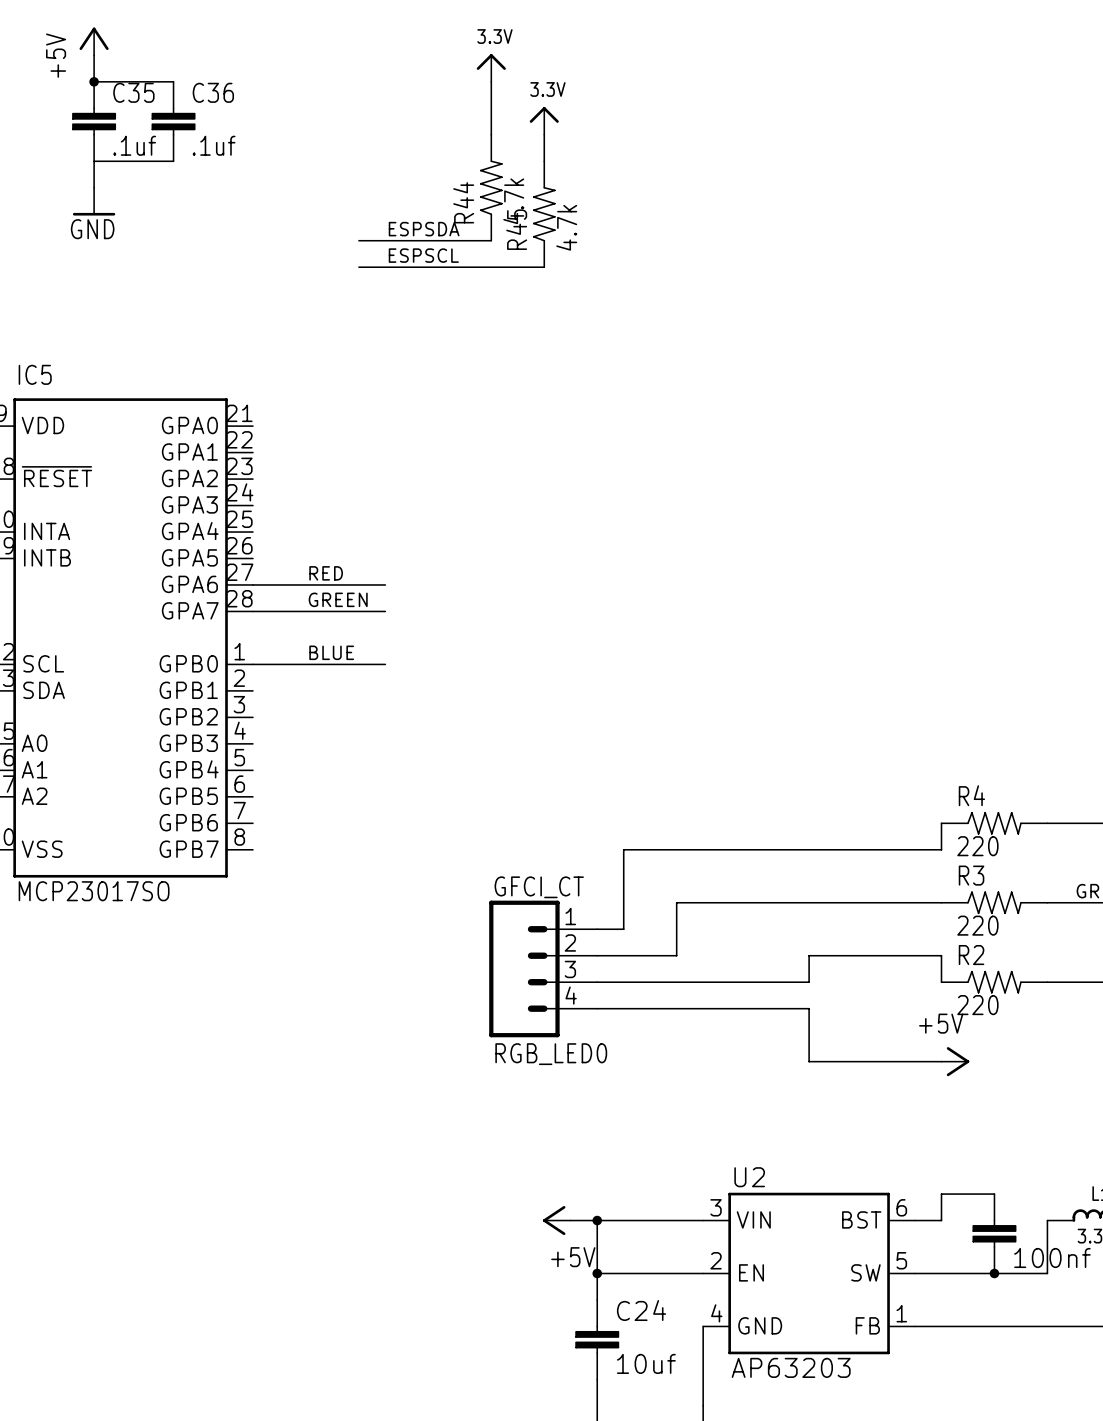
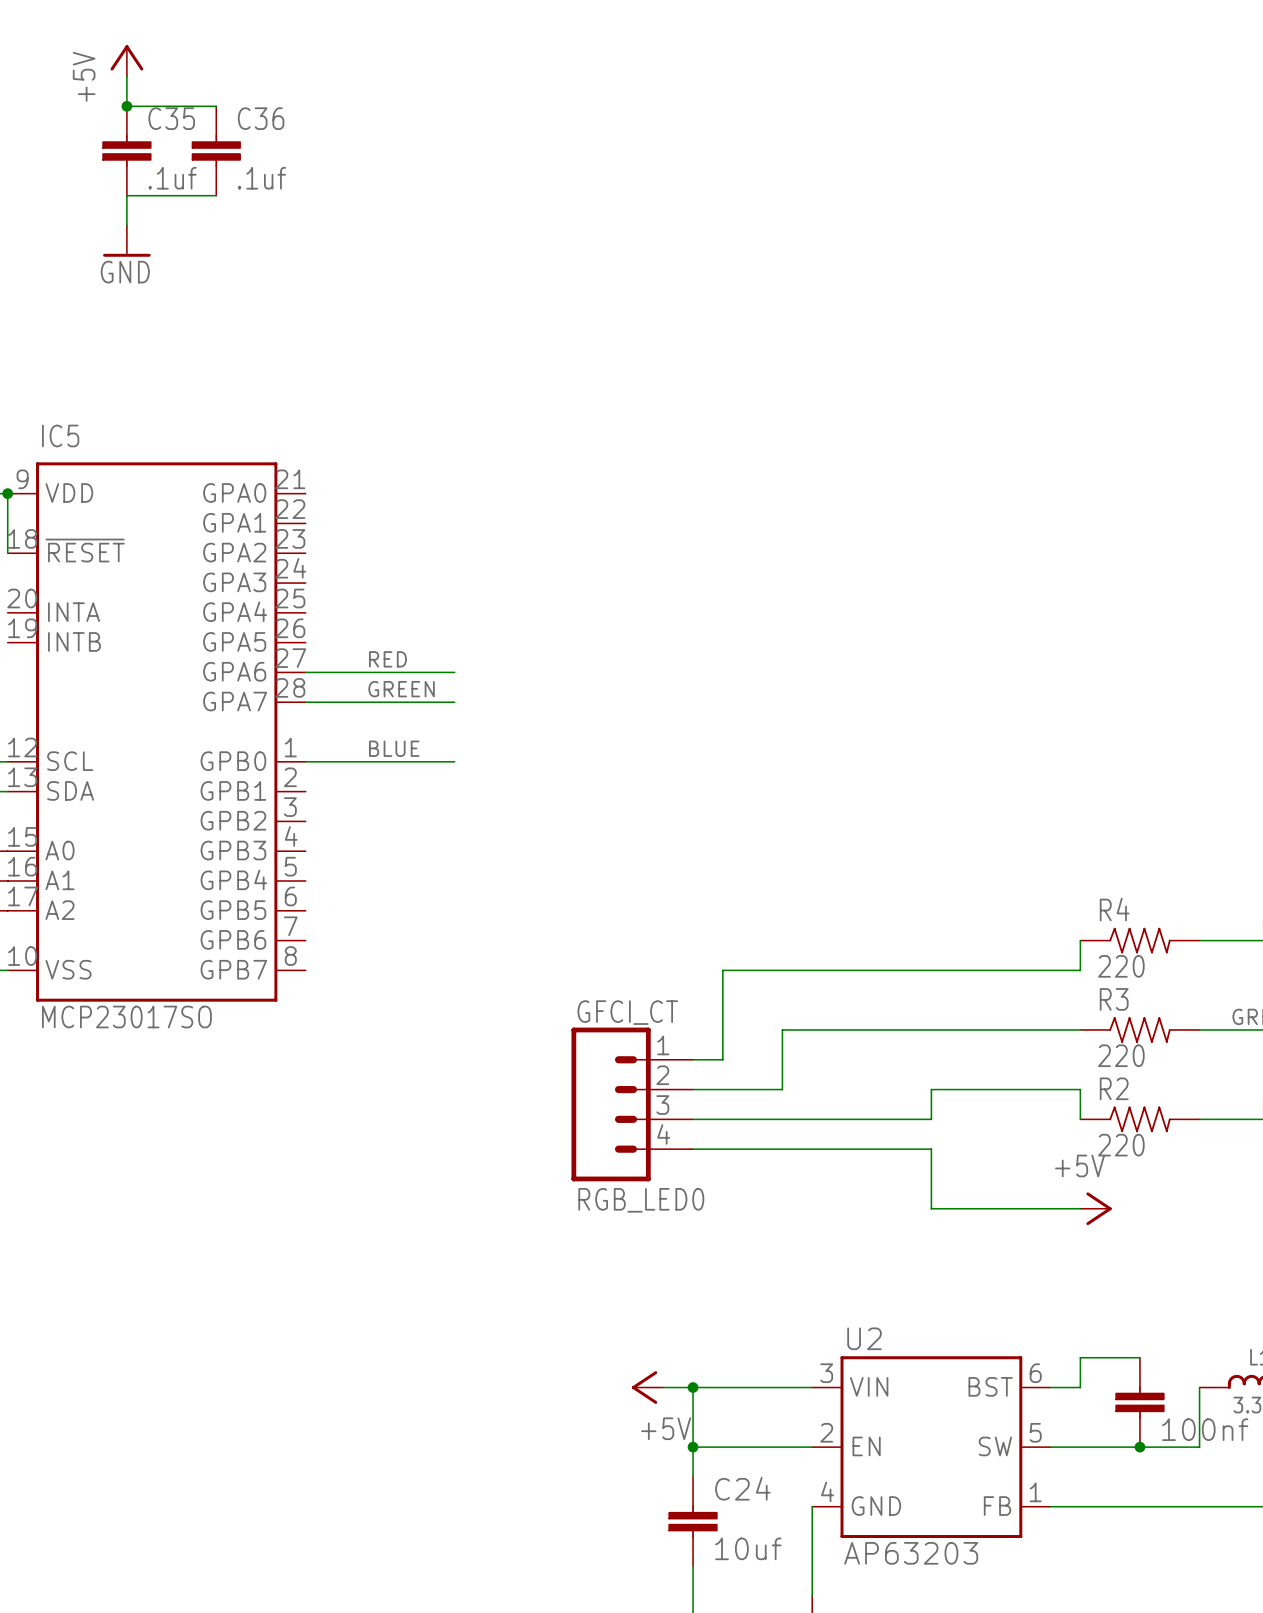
power symbol: 3.3V (491, 67) -> none
wire: (491, 81) (491, 134) -> none
power symbol: 3.3V (544, 120) -> none
wire: (544, 134) (544, 161) -> none
R44: 4.7k (491, 187) -> none
R45: 4.7k (544, 214) -> none
label: ESPSDA (424, 229) -> none
wire: (358, 240) (491, 240) -> none
label: ESPSCL (423, 255) -> none
wire: (358, 267) (544, 267) -> none

